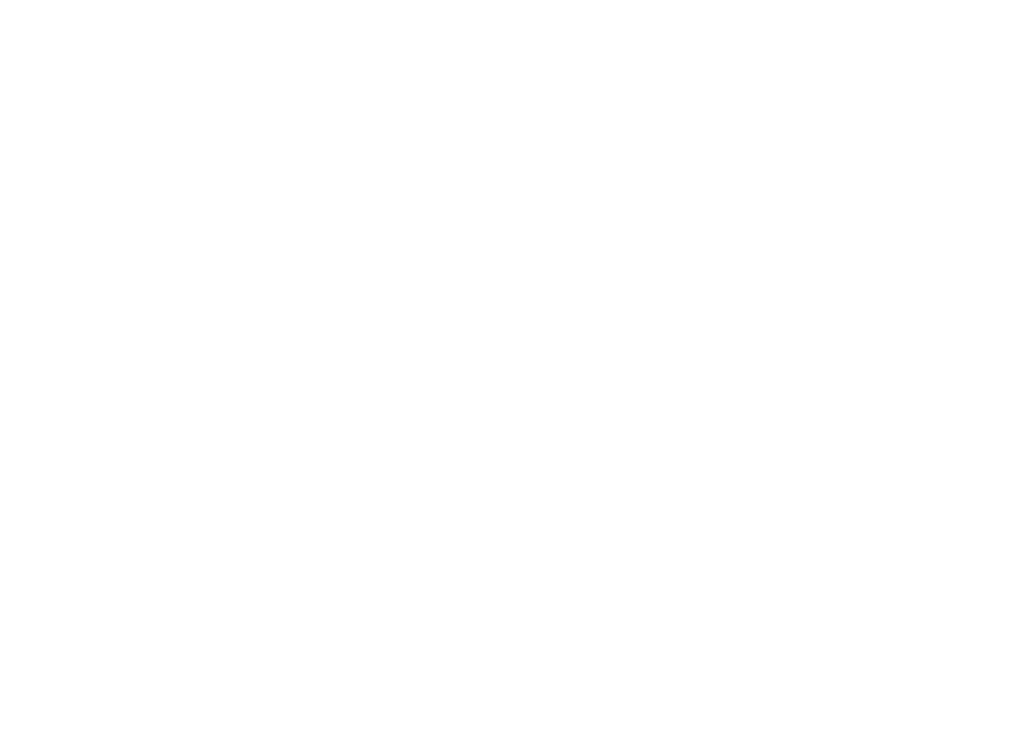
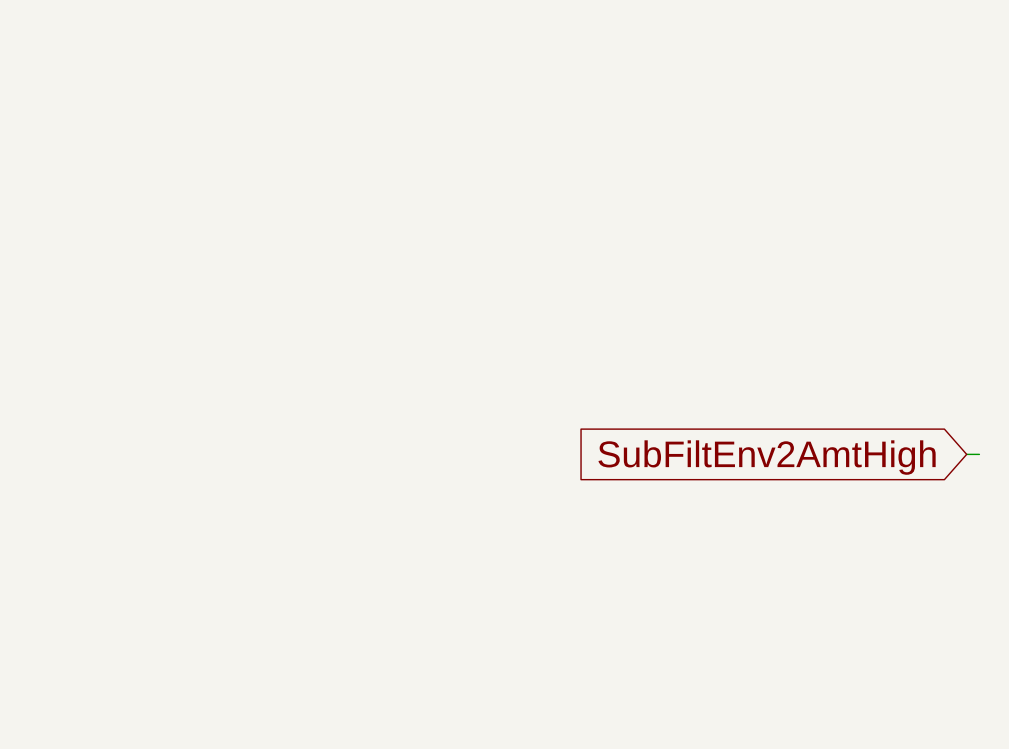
wire: none -> (966, 454) (979, 454)
global label: none -> SubFiltEnv2AmtHigh (767, 457)

